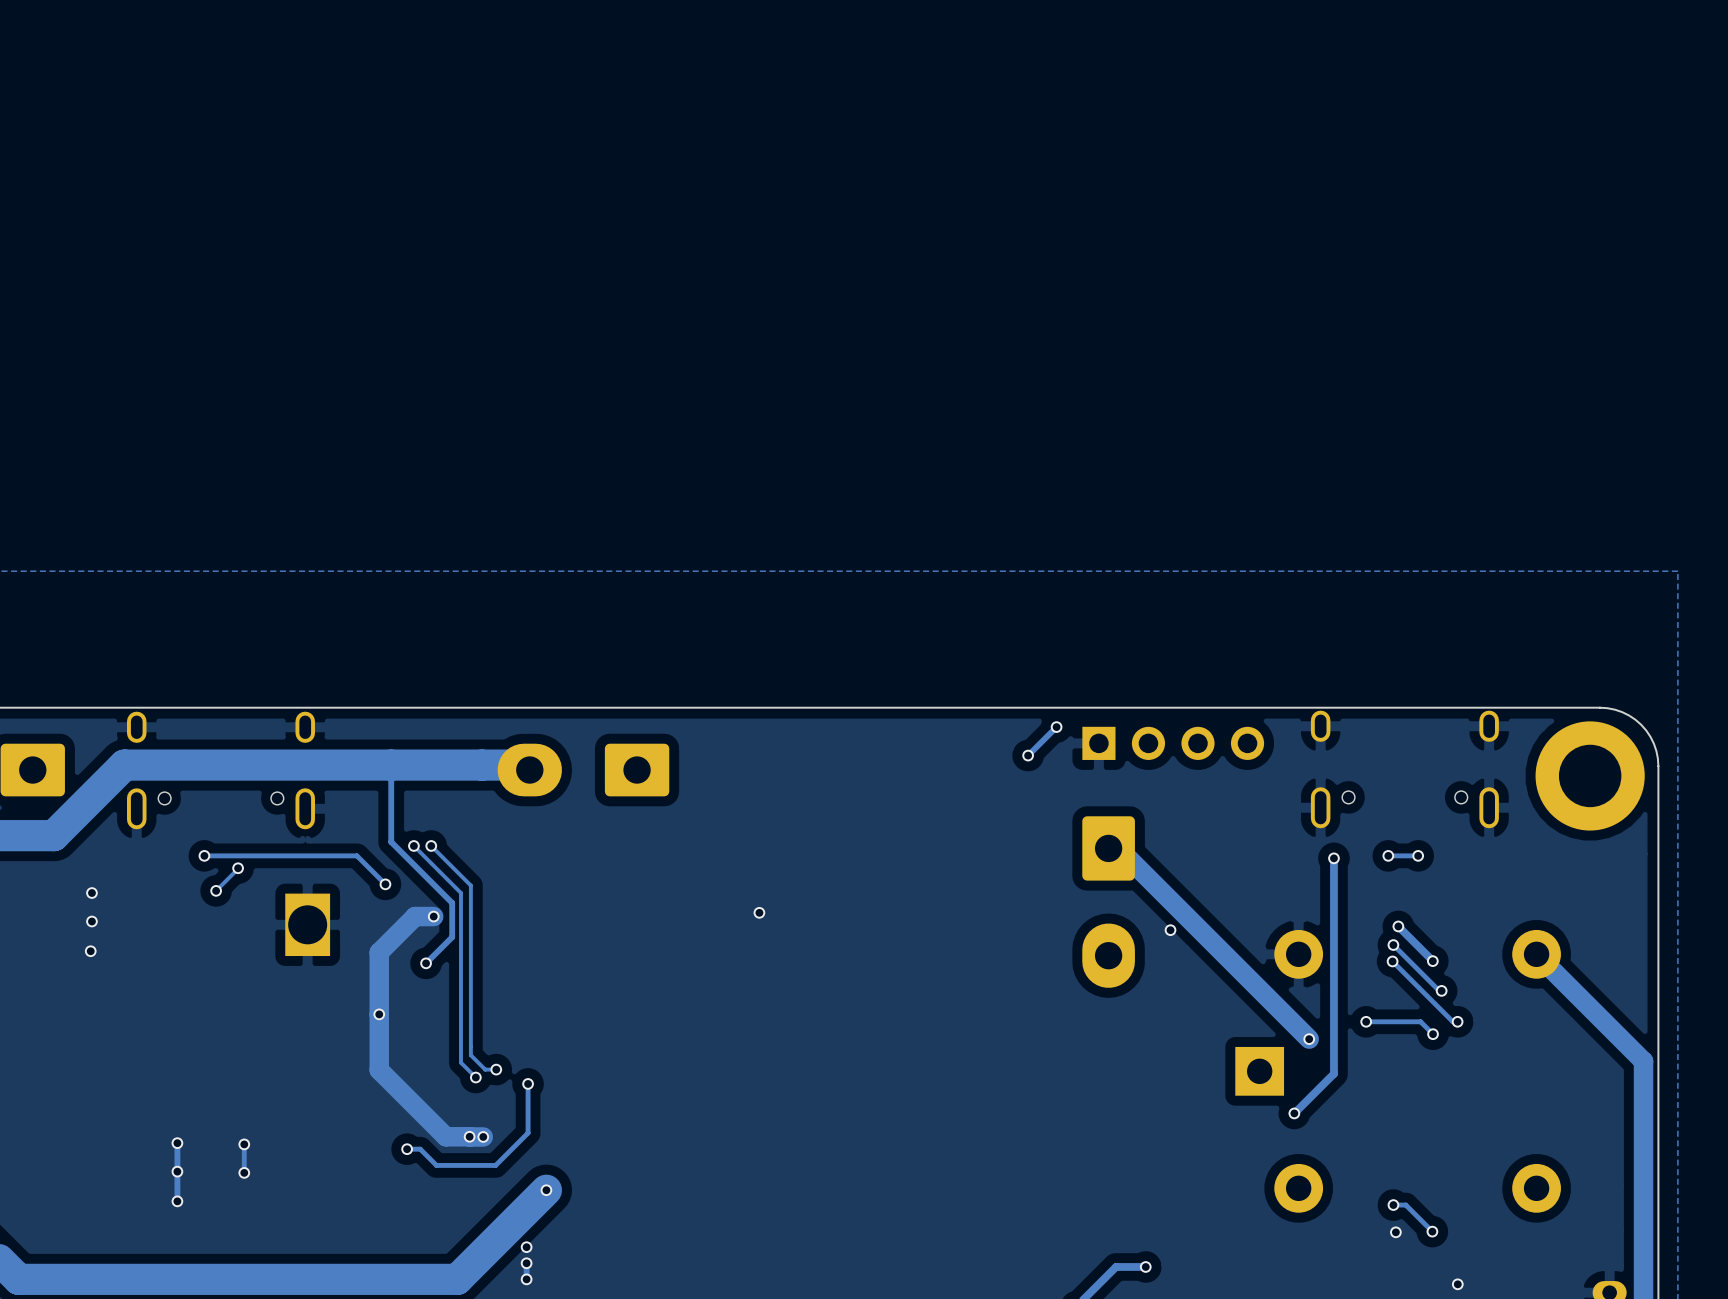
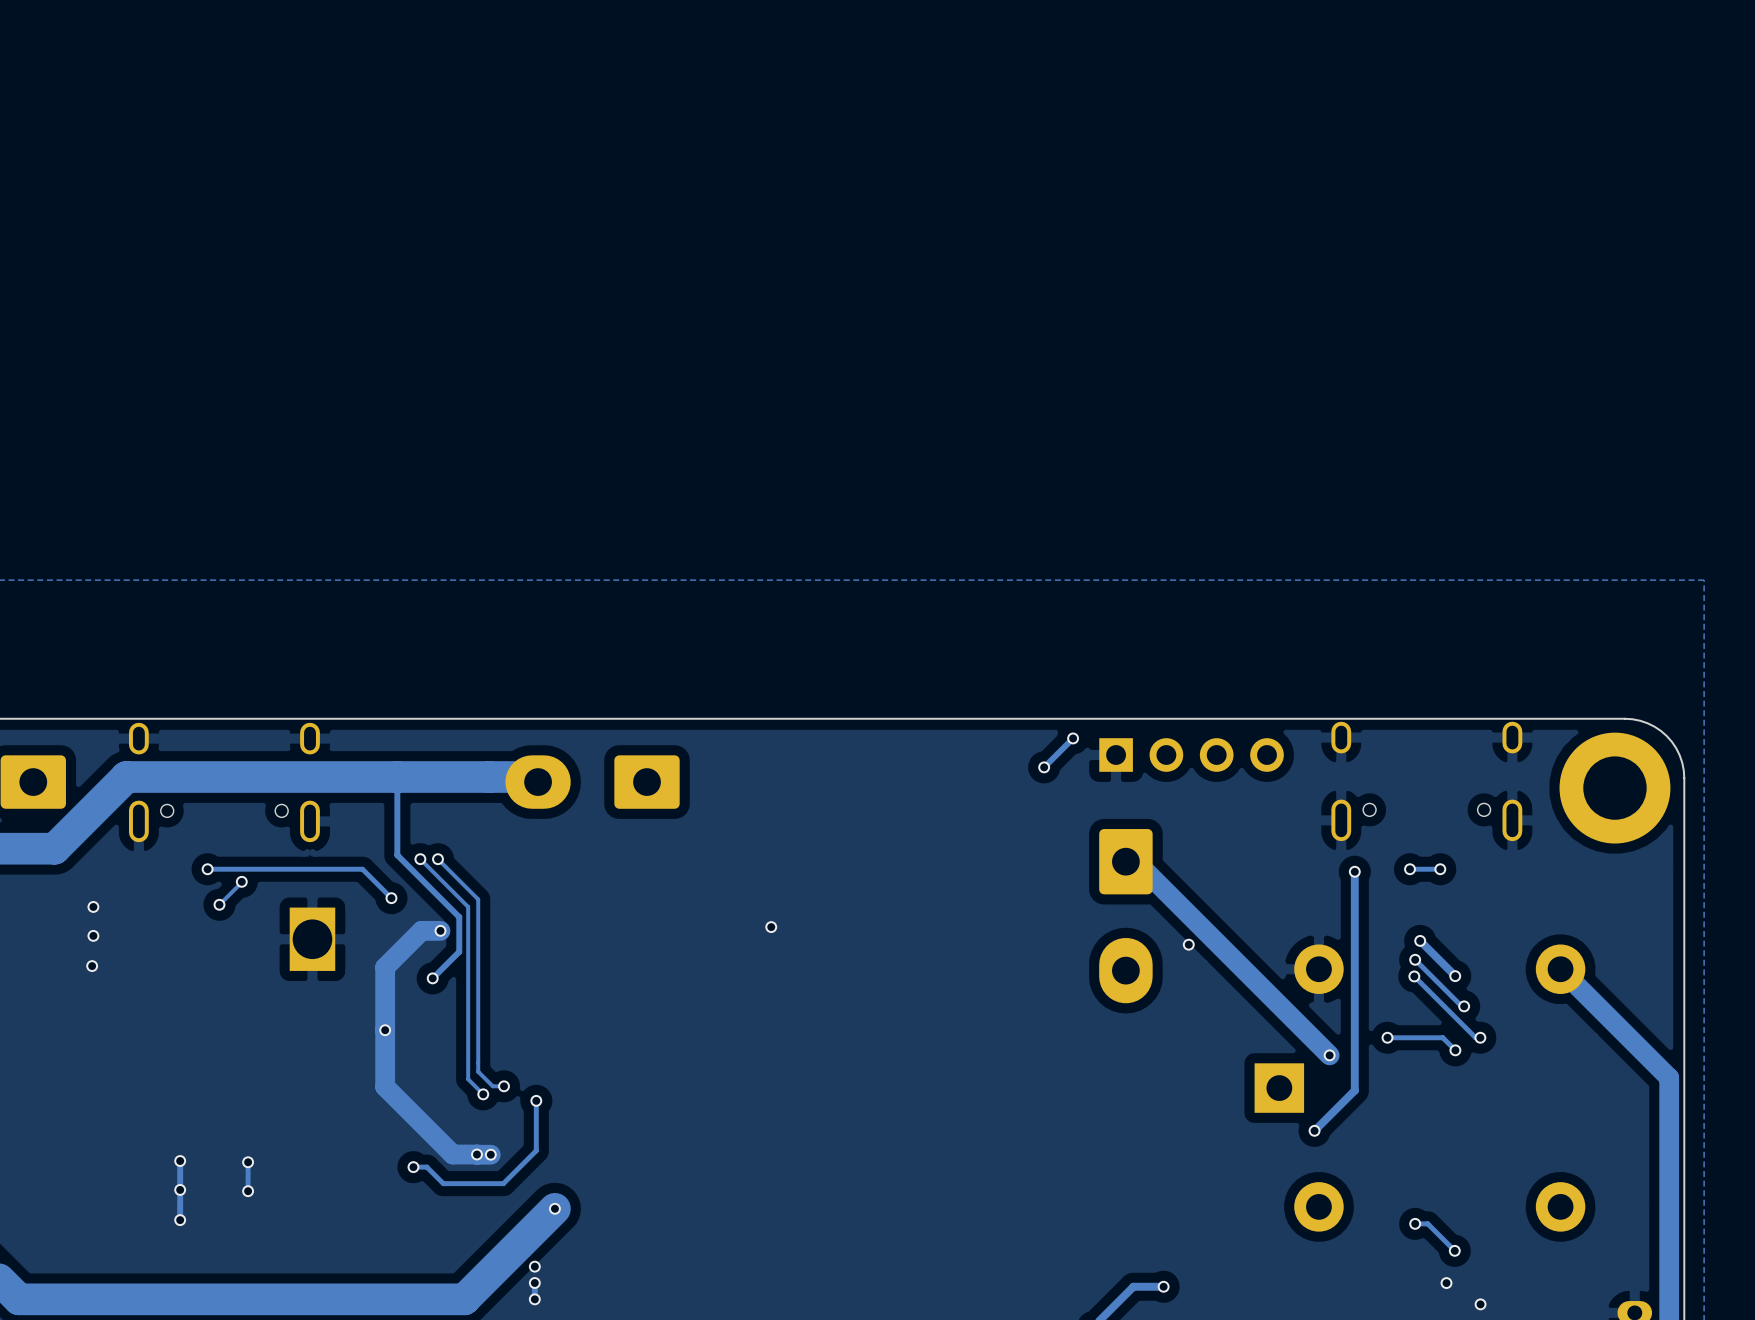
via position: (1395, 1232) -> (1446, 1283)

